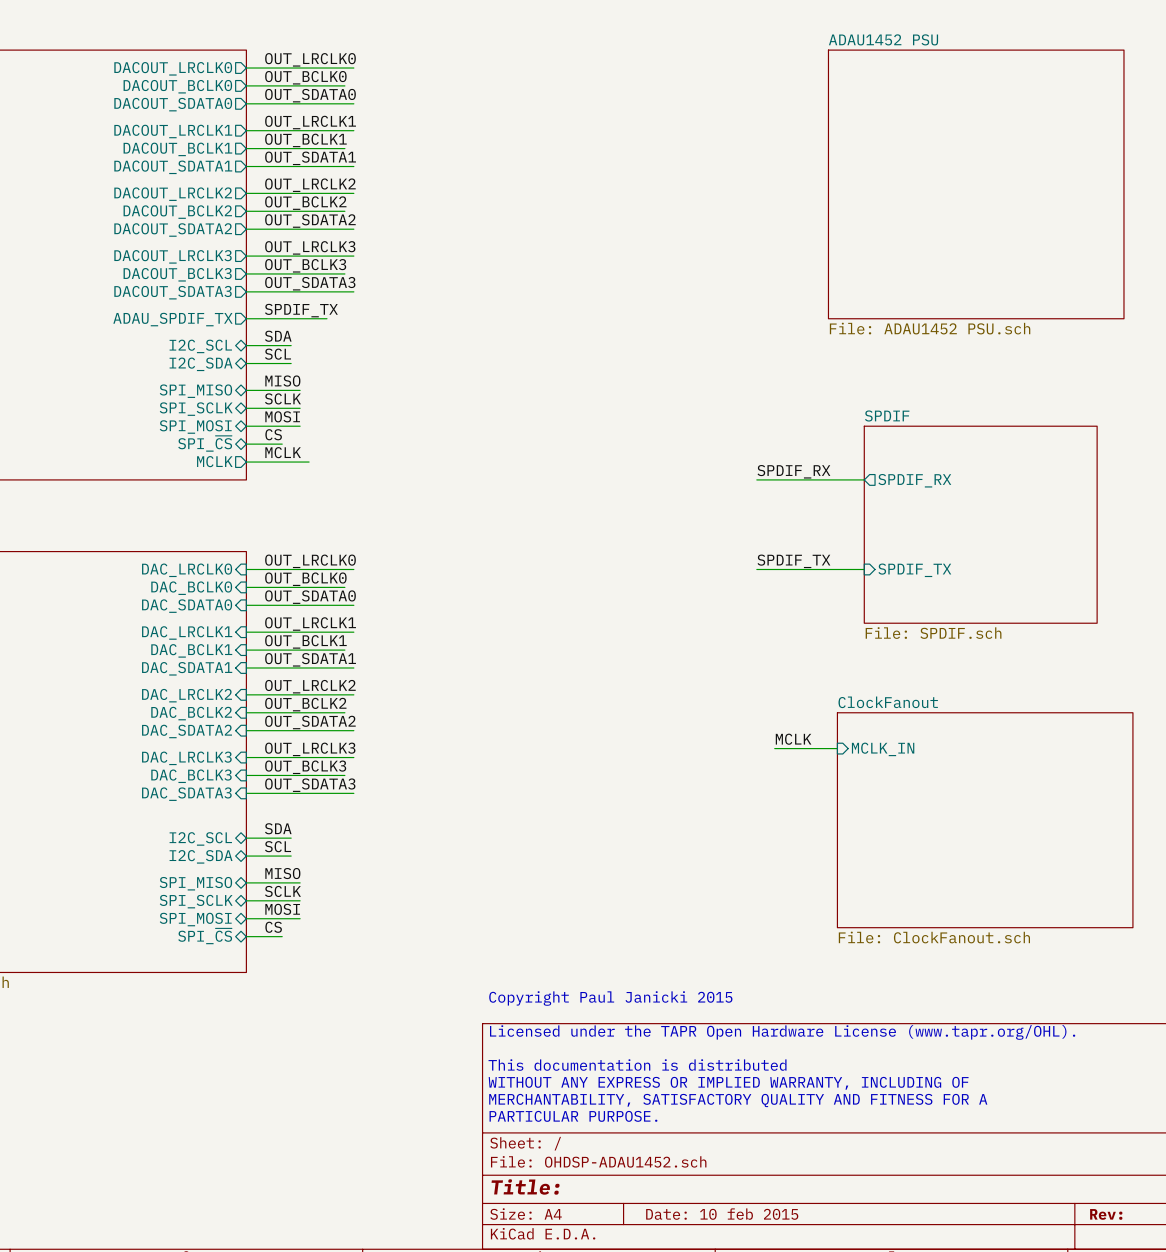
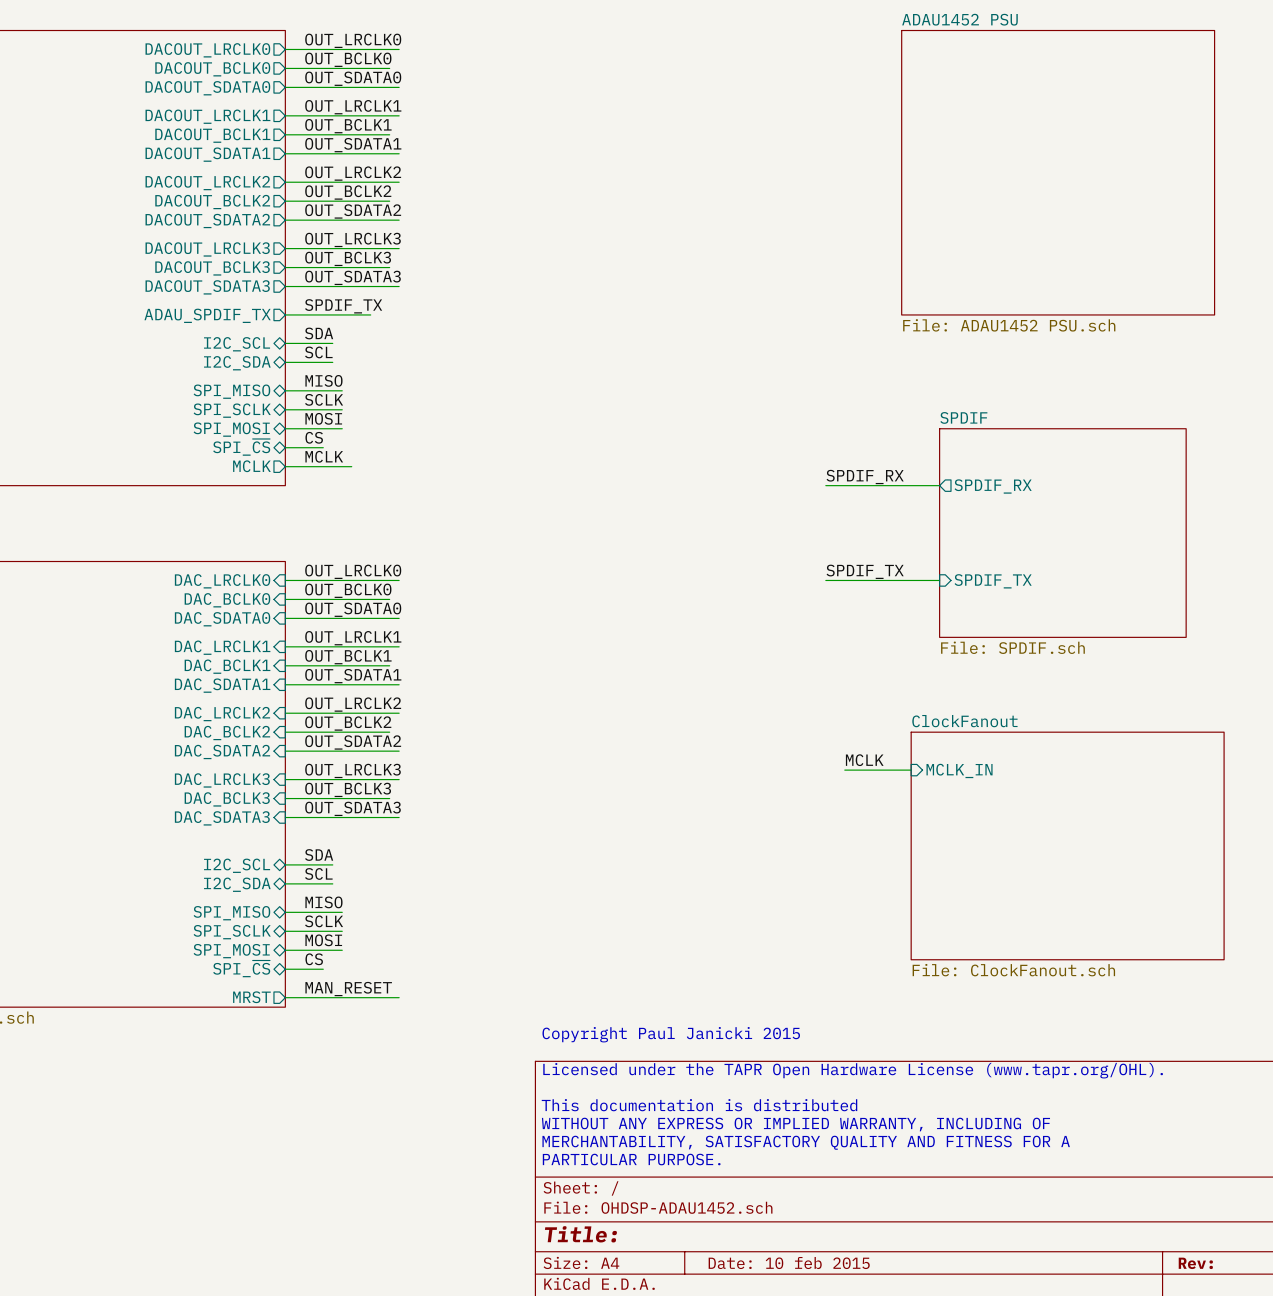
label: none -> MAN_RESET (348, 989)
sheet pin: none -> MRST (251, 997)
wire: none -> (285, 997) (399, 997)

